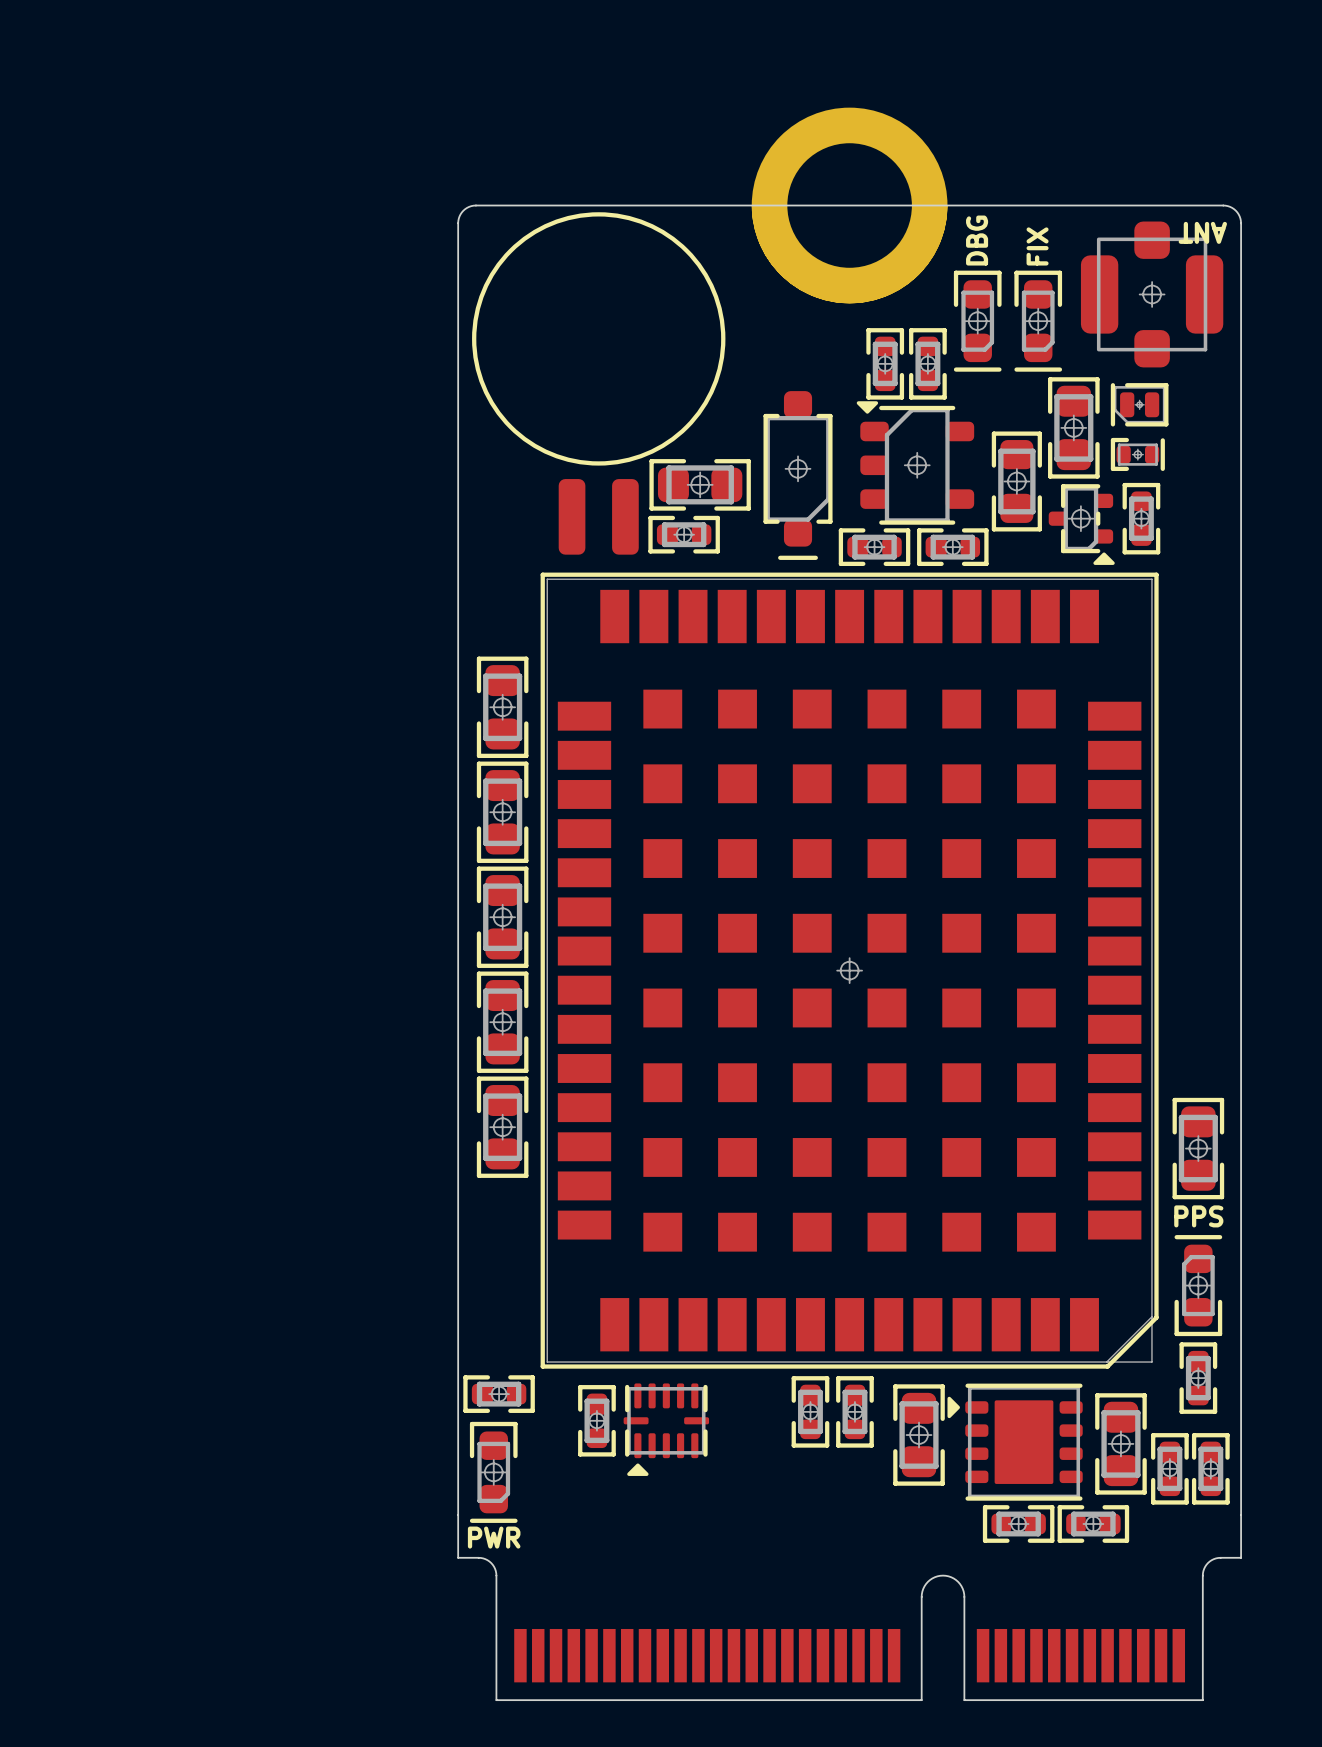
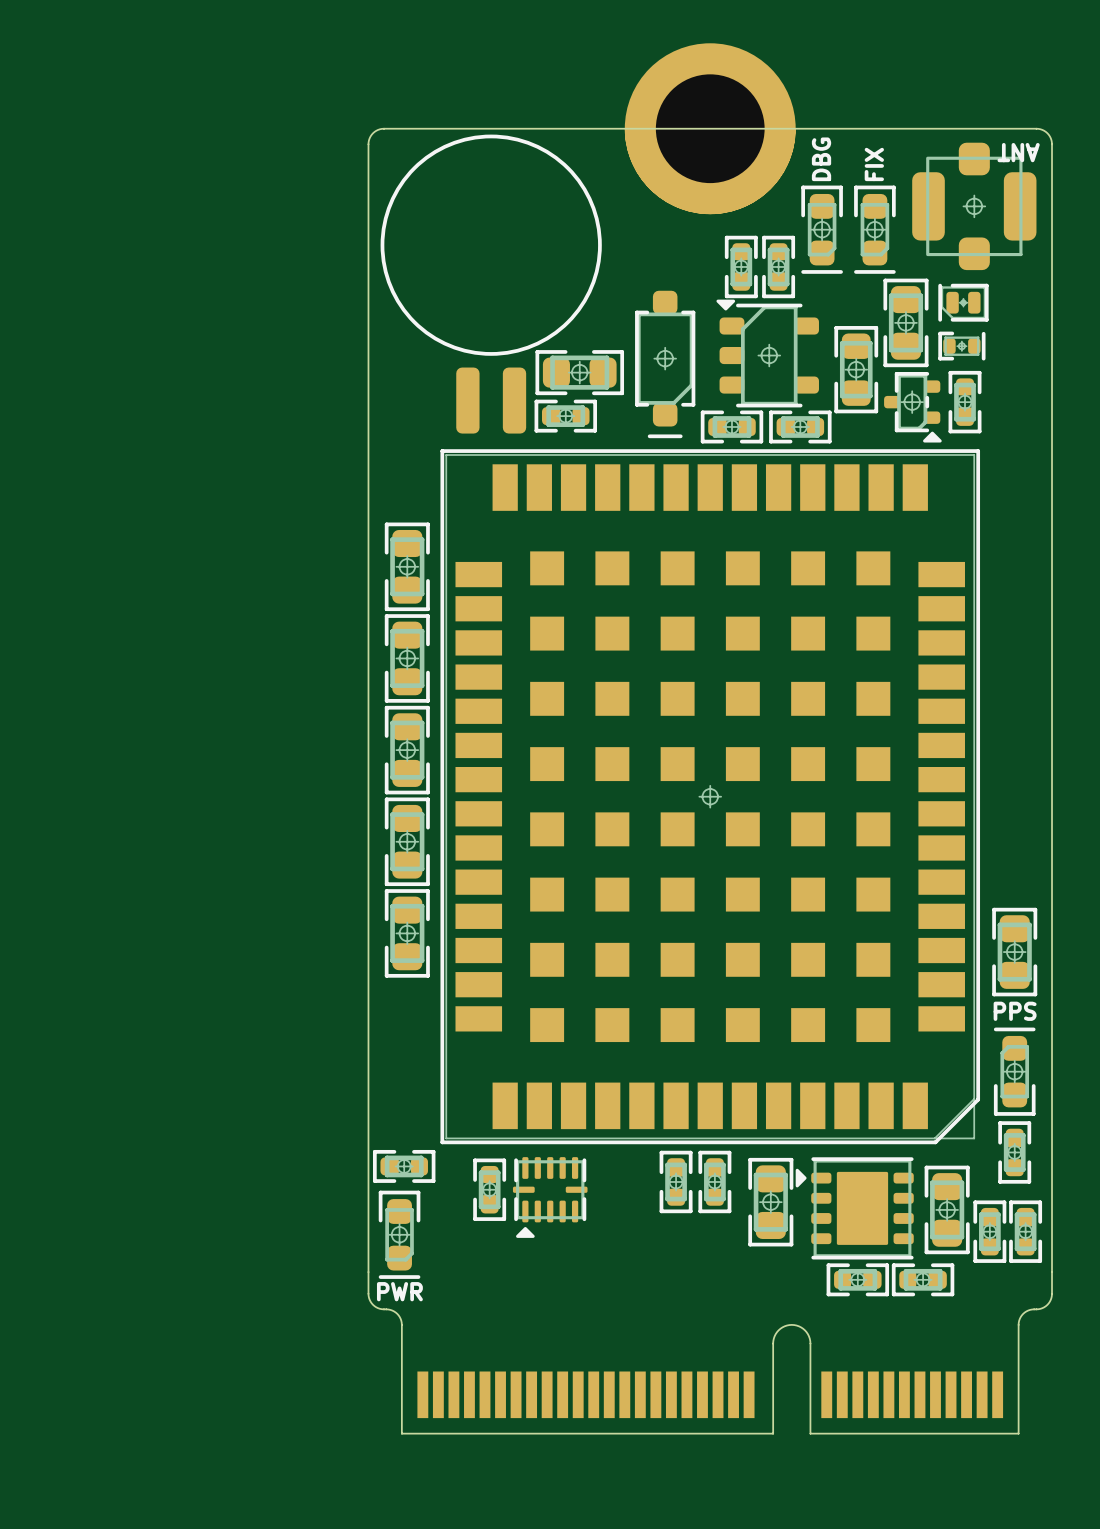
part rotation: 0° (596, 1420) -> 180° (489, 1189)
part footprint: [457, 1514, 1242, 1702] -> [367, 1271, 1053, 1435]

